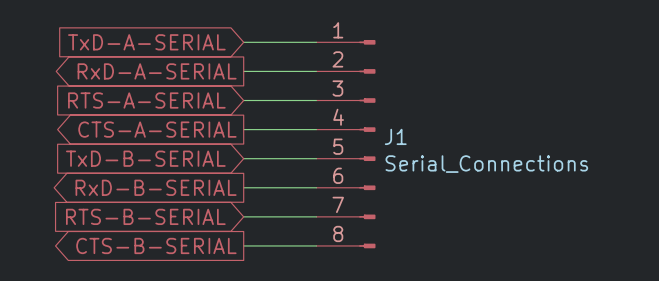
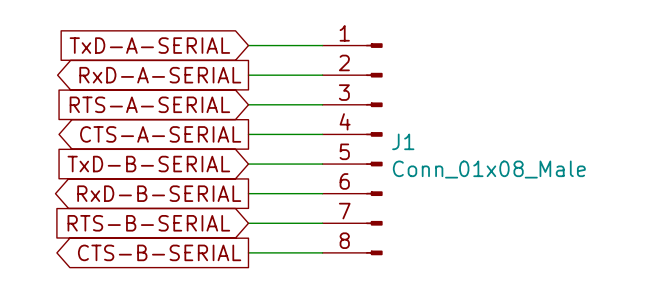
J1 value: Serial_Connections (486, 164) -> Conn_01x08_Male (489, 169)

